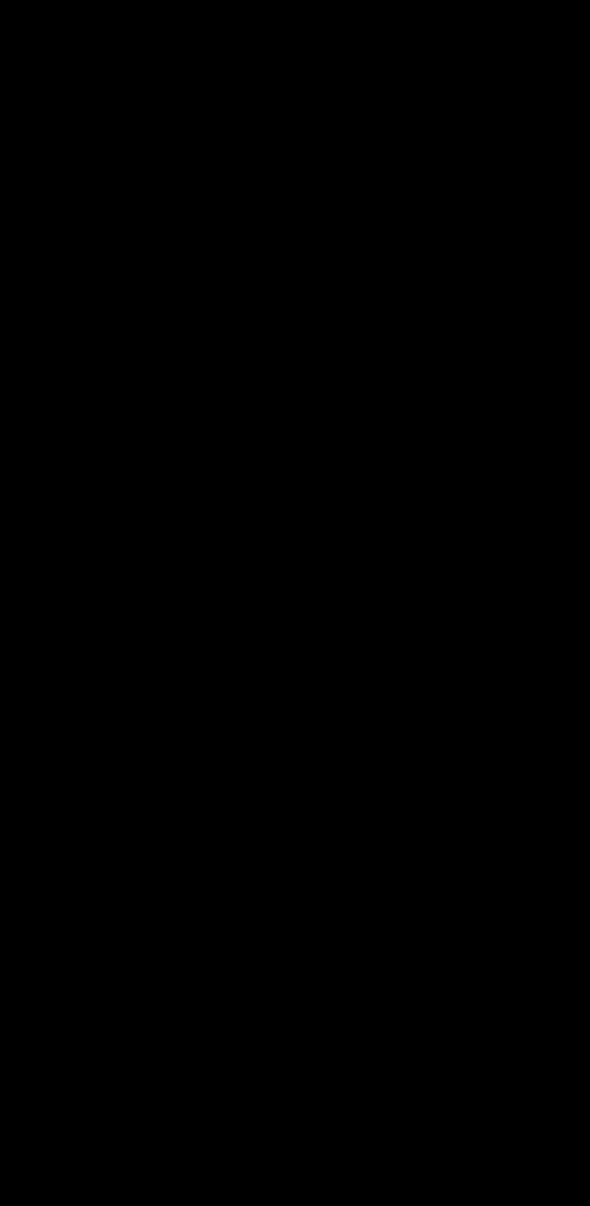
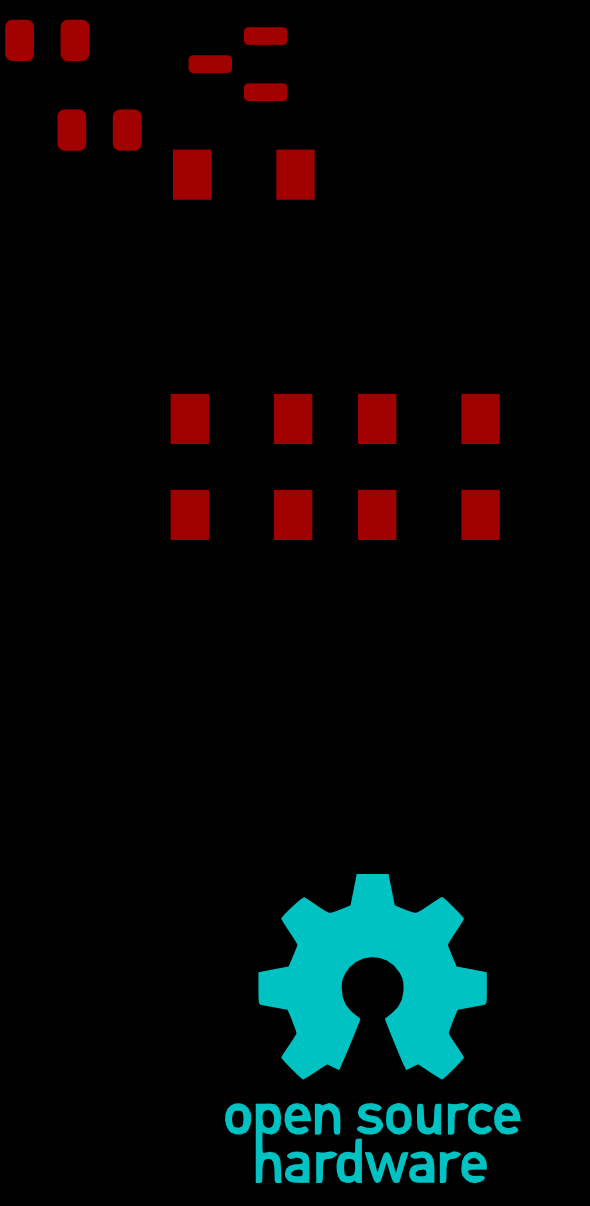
part: none -> (47, 40)
part: none -> (237, 64)
part: none -> (99, 130)
part: none -> (243, 174)
part: none -> (241, 419)
part: none -> (428, 419)
part: none -> (241, 514)
part: none -> (428, 514)
drawing: none -> [225, 873, 521, 1184]

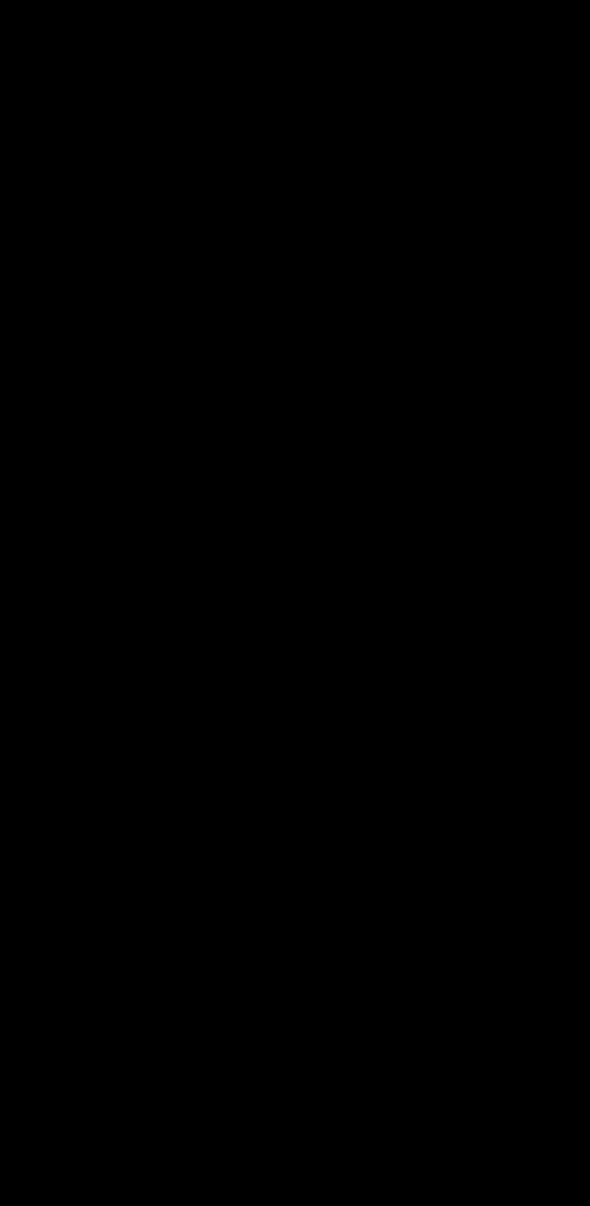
part: (47, 40) -> none
part: (237, 64) -> none
part: (99, 130) -> none
part: (243, 174) -> none
part: (241, 419) -> none
part: (428, 419) -> none
part: (241, 514) -> none
part: (428, 514) -> none
drawing: [225, 873, 521, 1184] -> none

